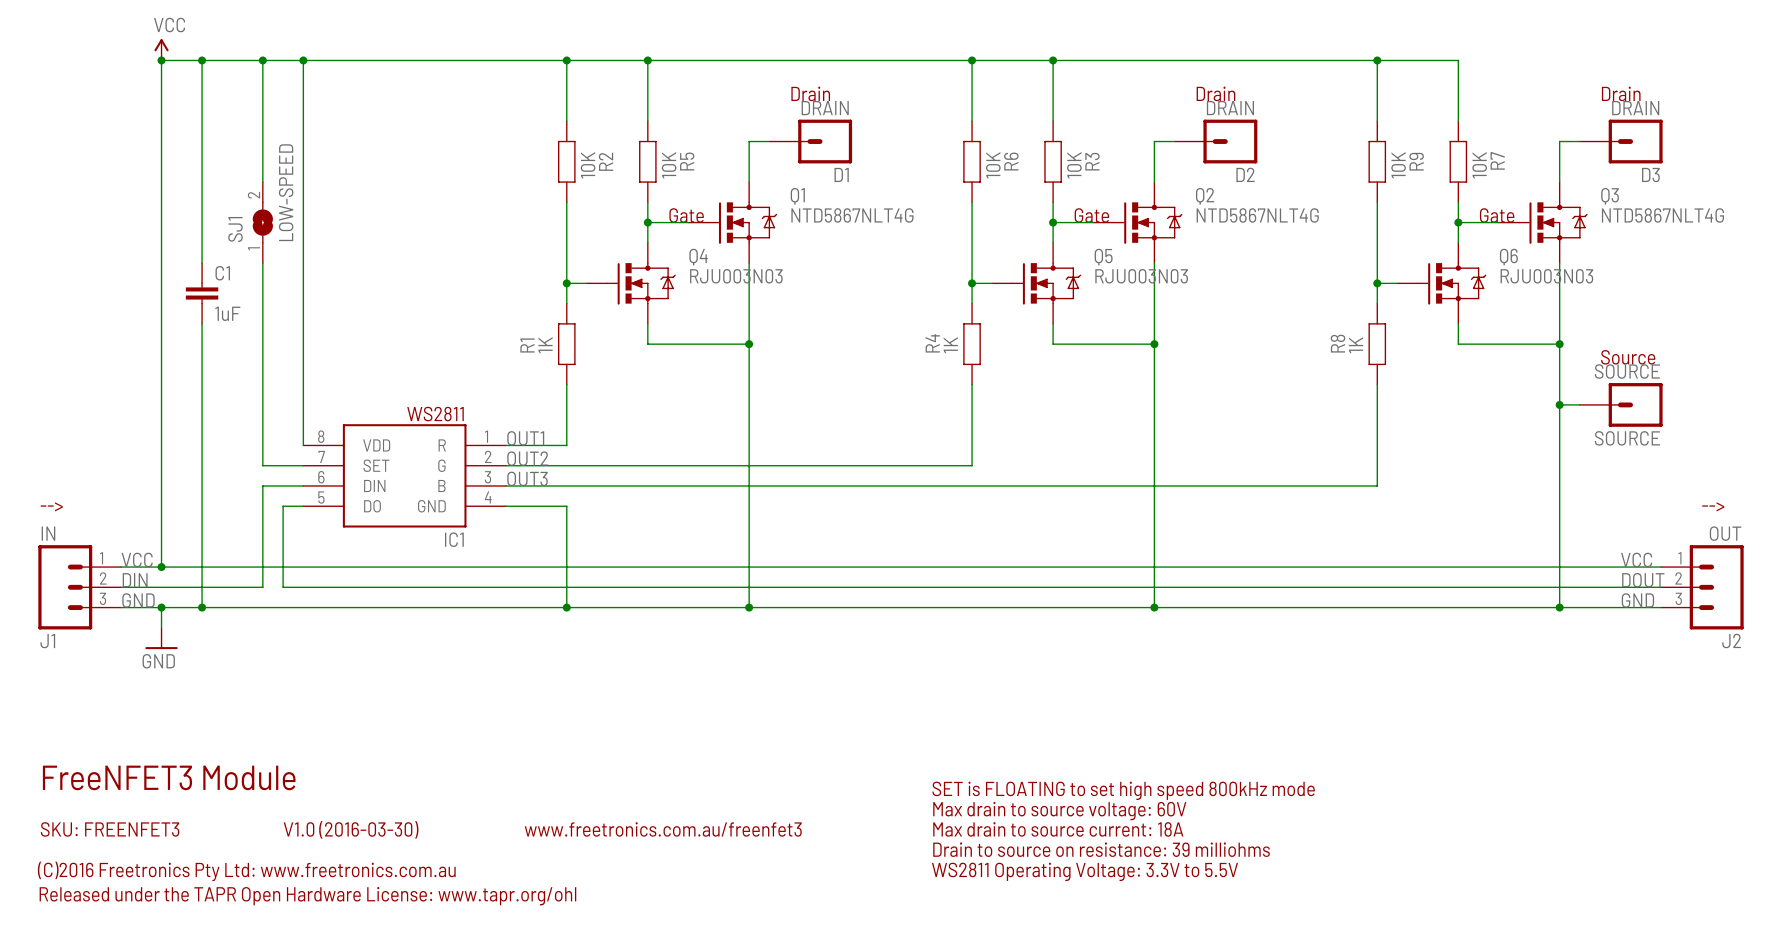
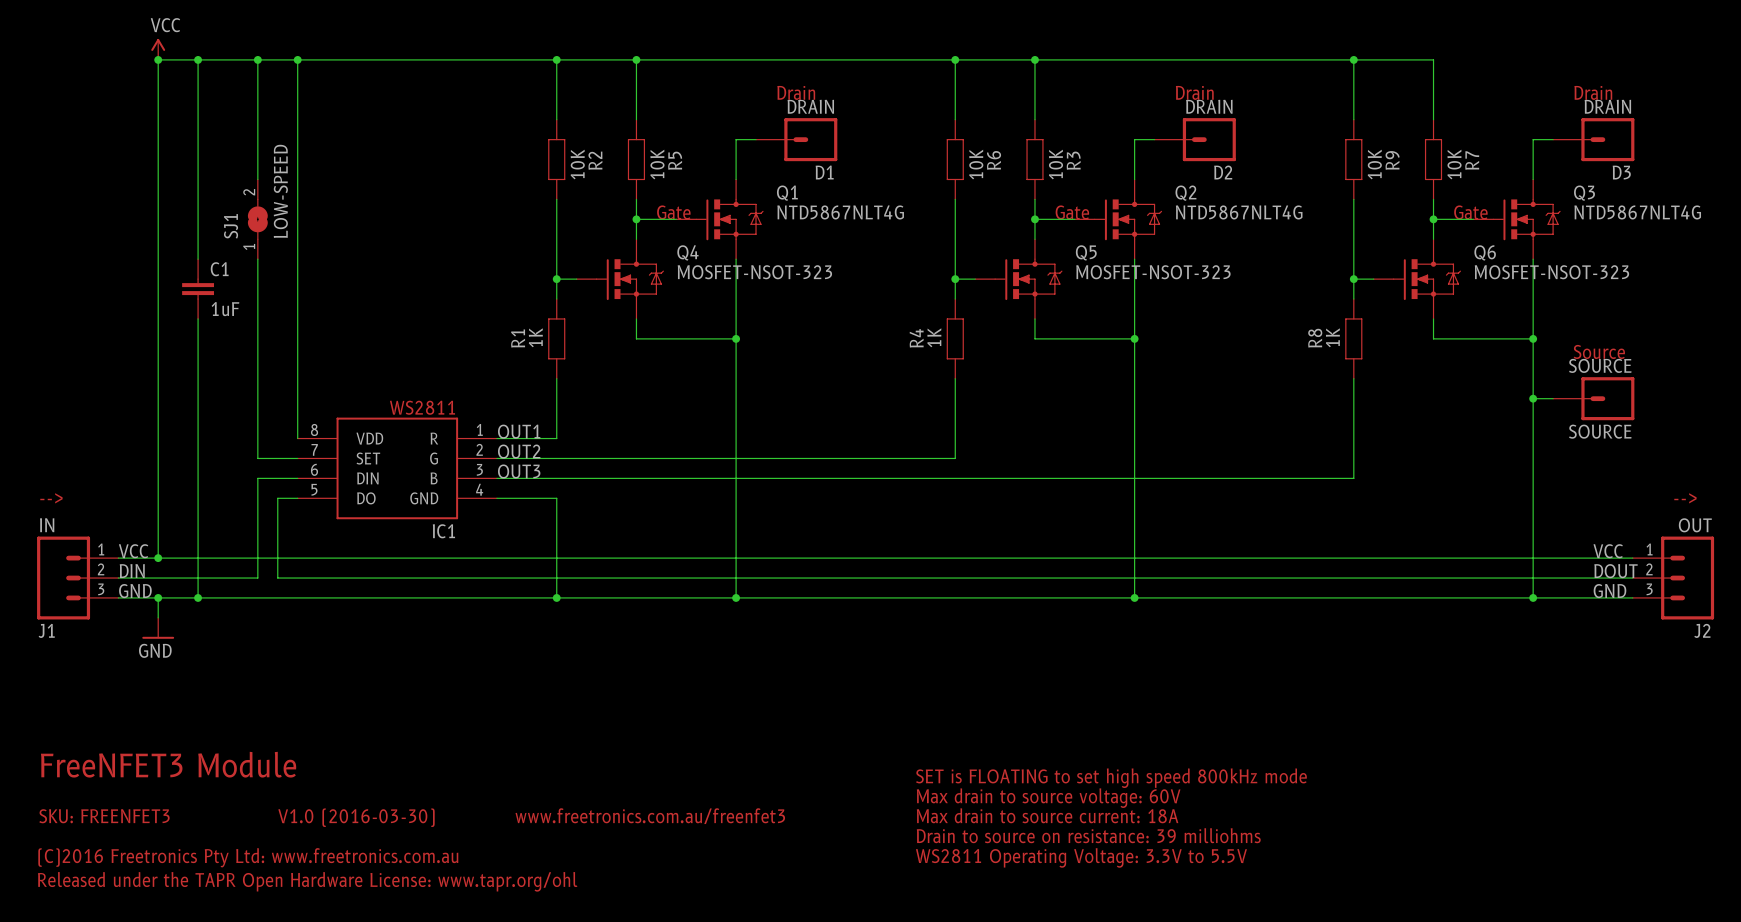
Q4 value: RJU003N03 (736, 276) -> MOSFET-NSOT-323 (754, 272)
Q5 value: RJU003N03 (1141, 276) -> MOSFET-NSOT-323 (1153, 272)
Q6 value: RJU003N03 (1546, 276) -> MOSFET-NSOT-323 (1551, 272)

